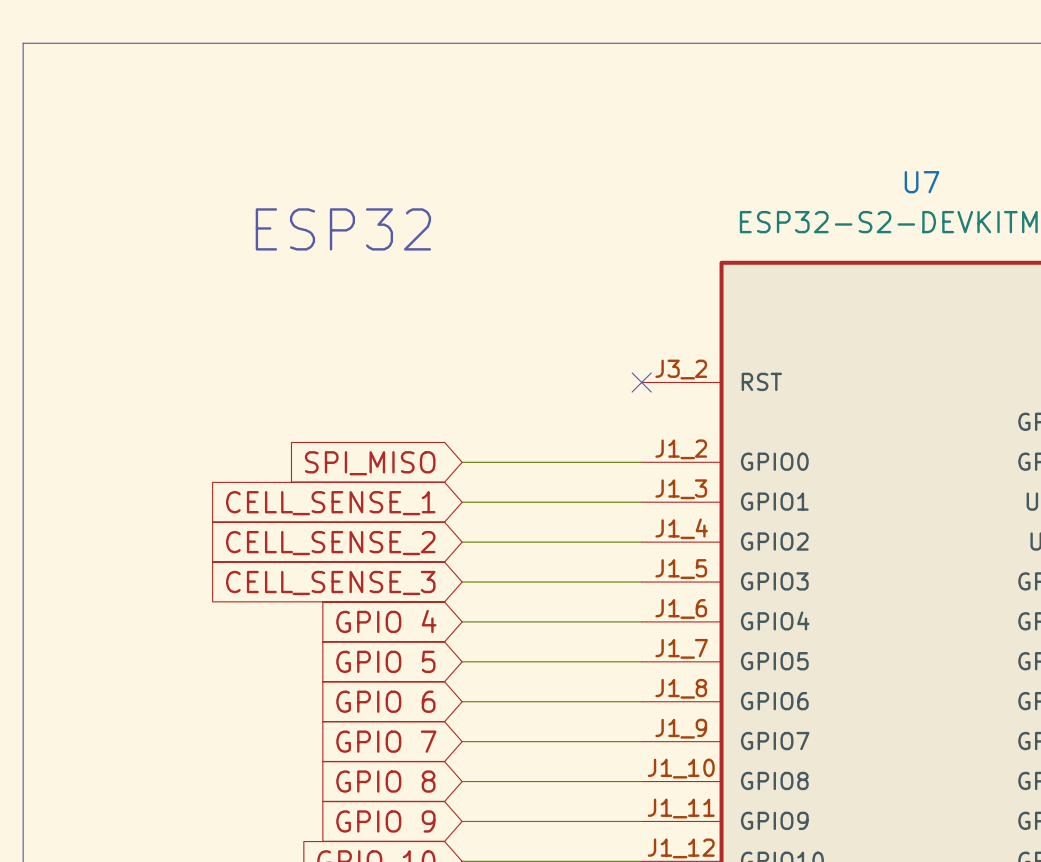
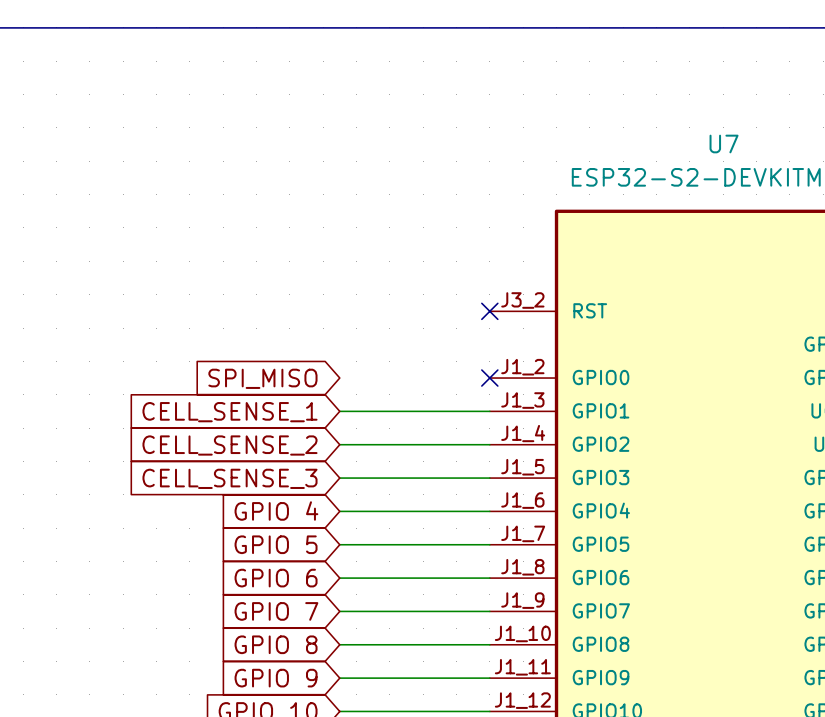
text: ESP32 (343, 229) -> none
wire: (462, 462) (641, 462) -> none
no-connect mark: none -> (489, 378)

